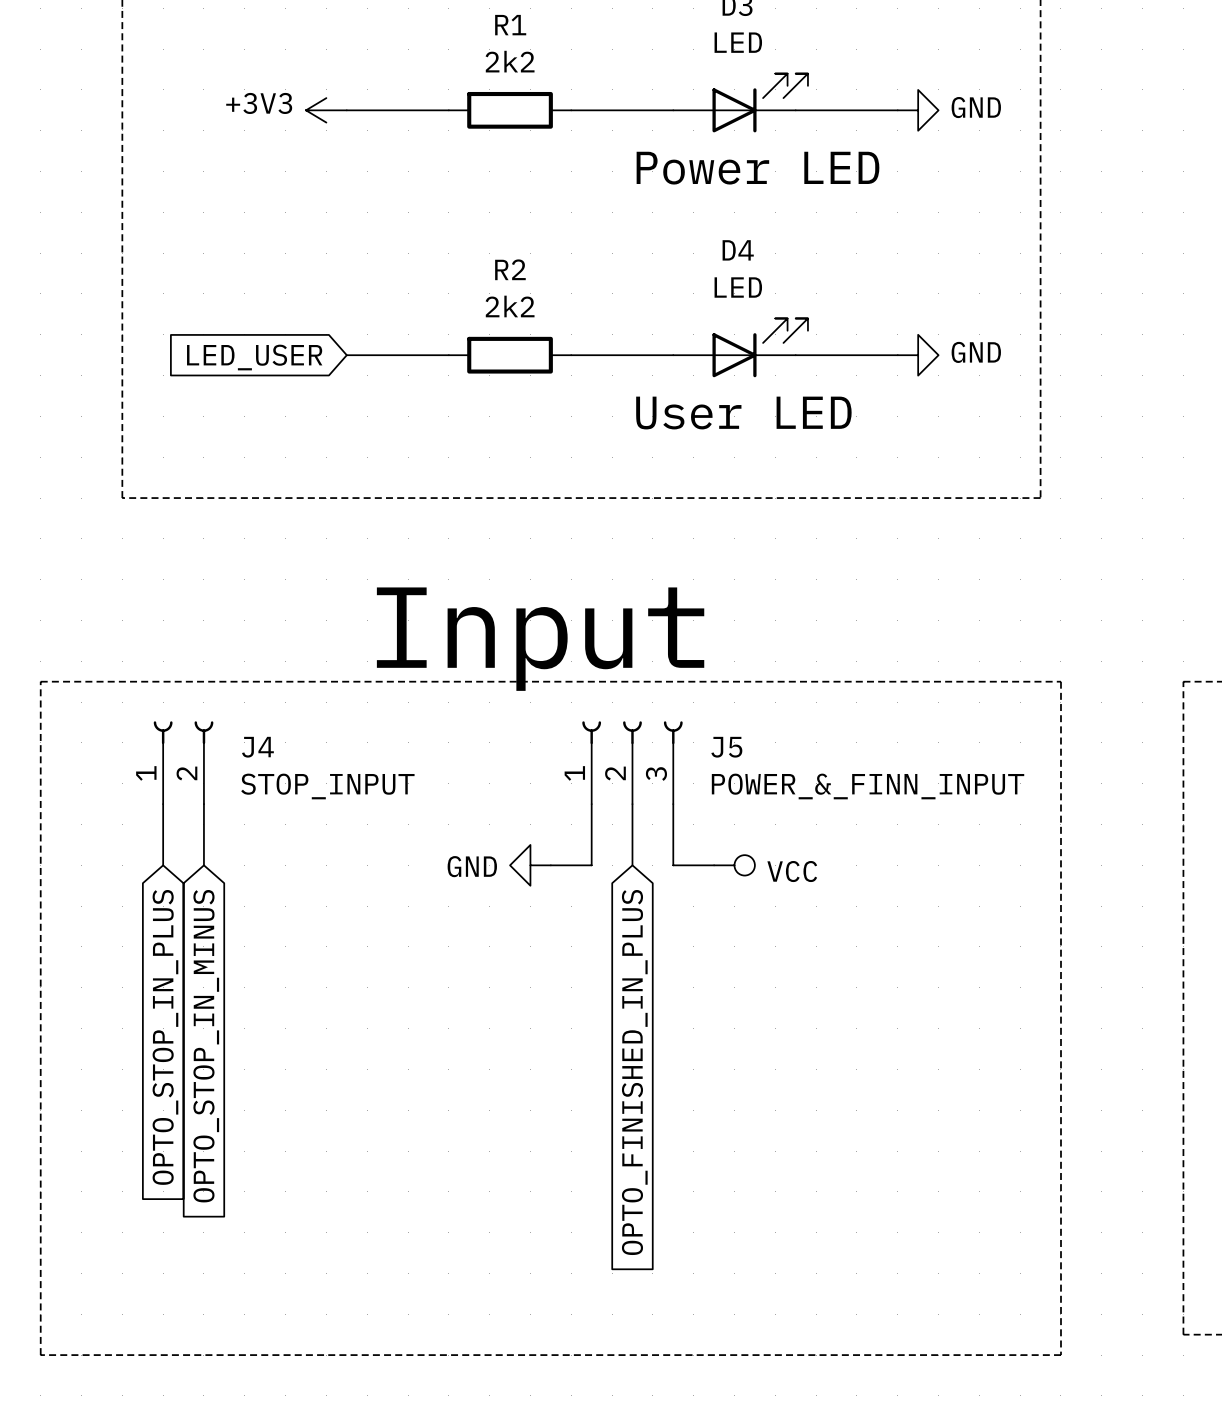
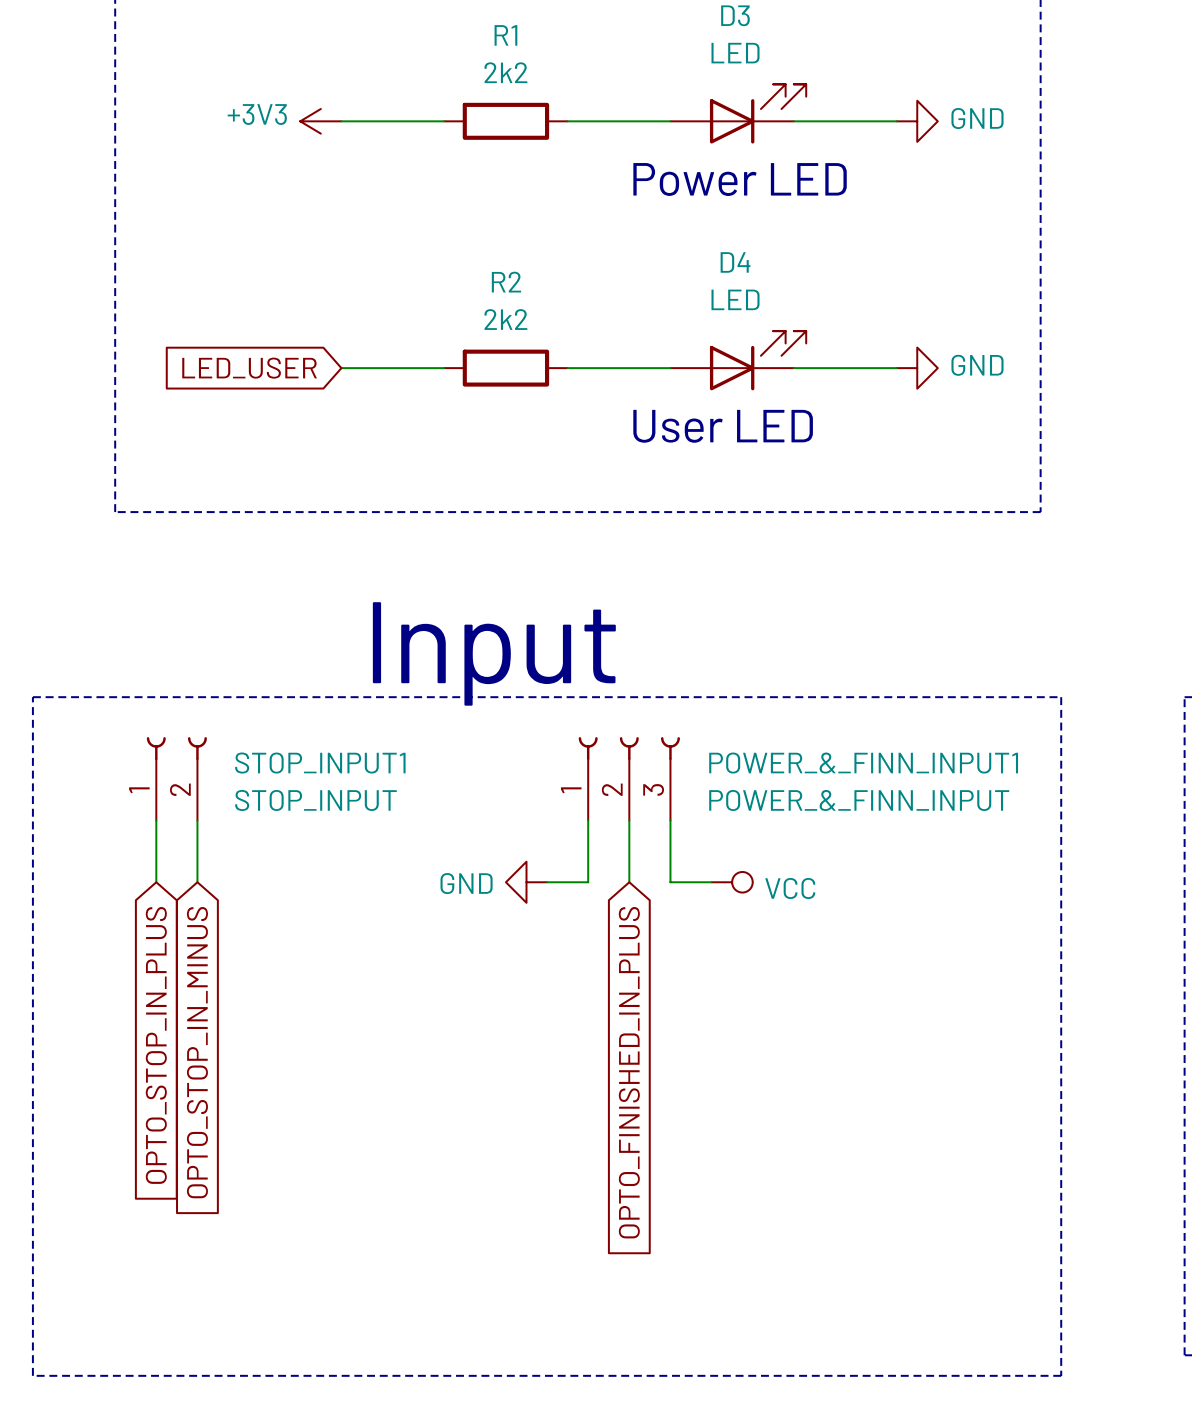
J4 name: J4 (257, 747) -> STOP_INPUT1 (320, 763)
J5 name: J5 (726, 747) -> POWER_&_FINN_INPUT1 (863, 763)

